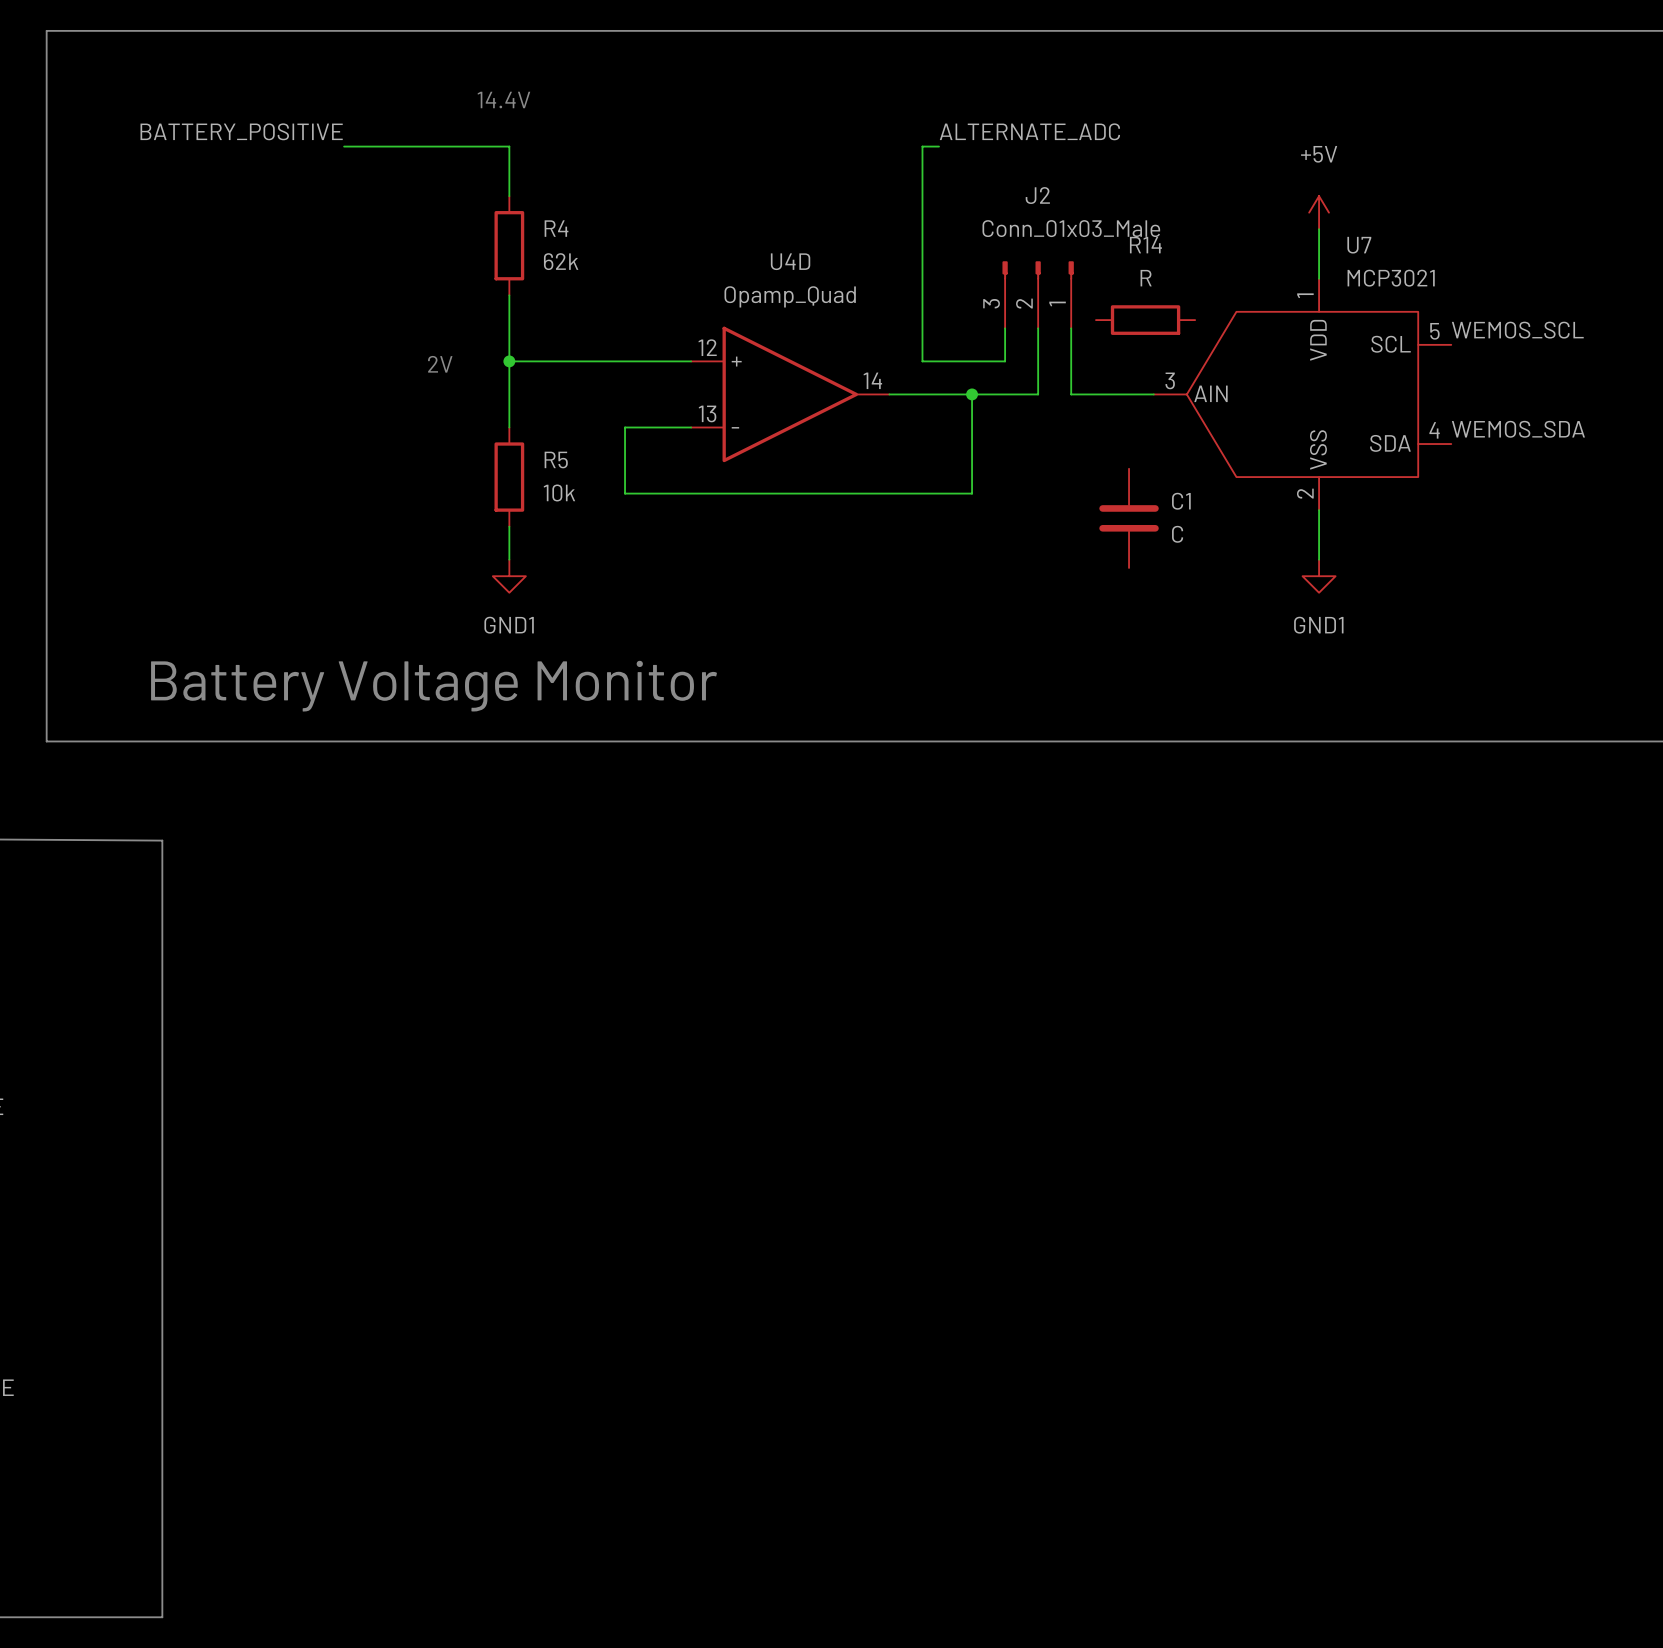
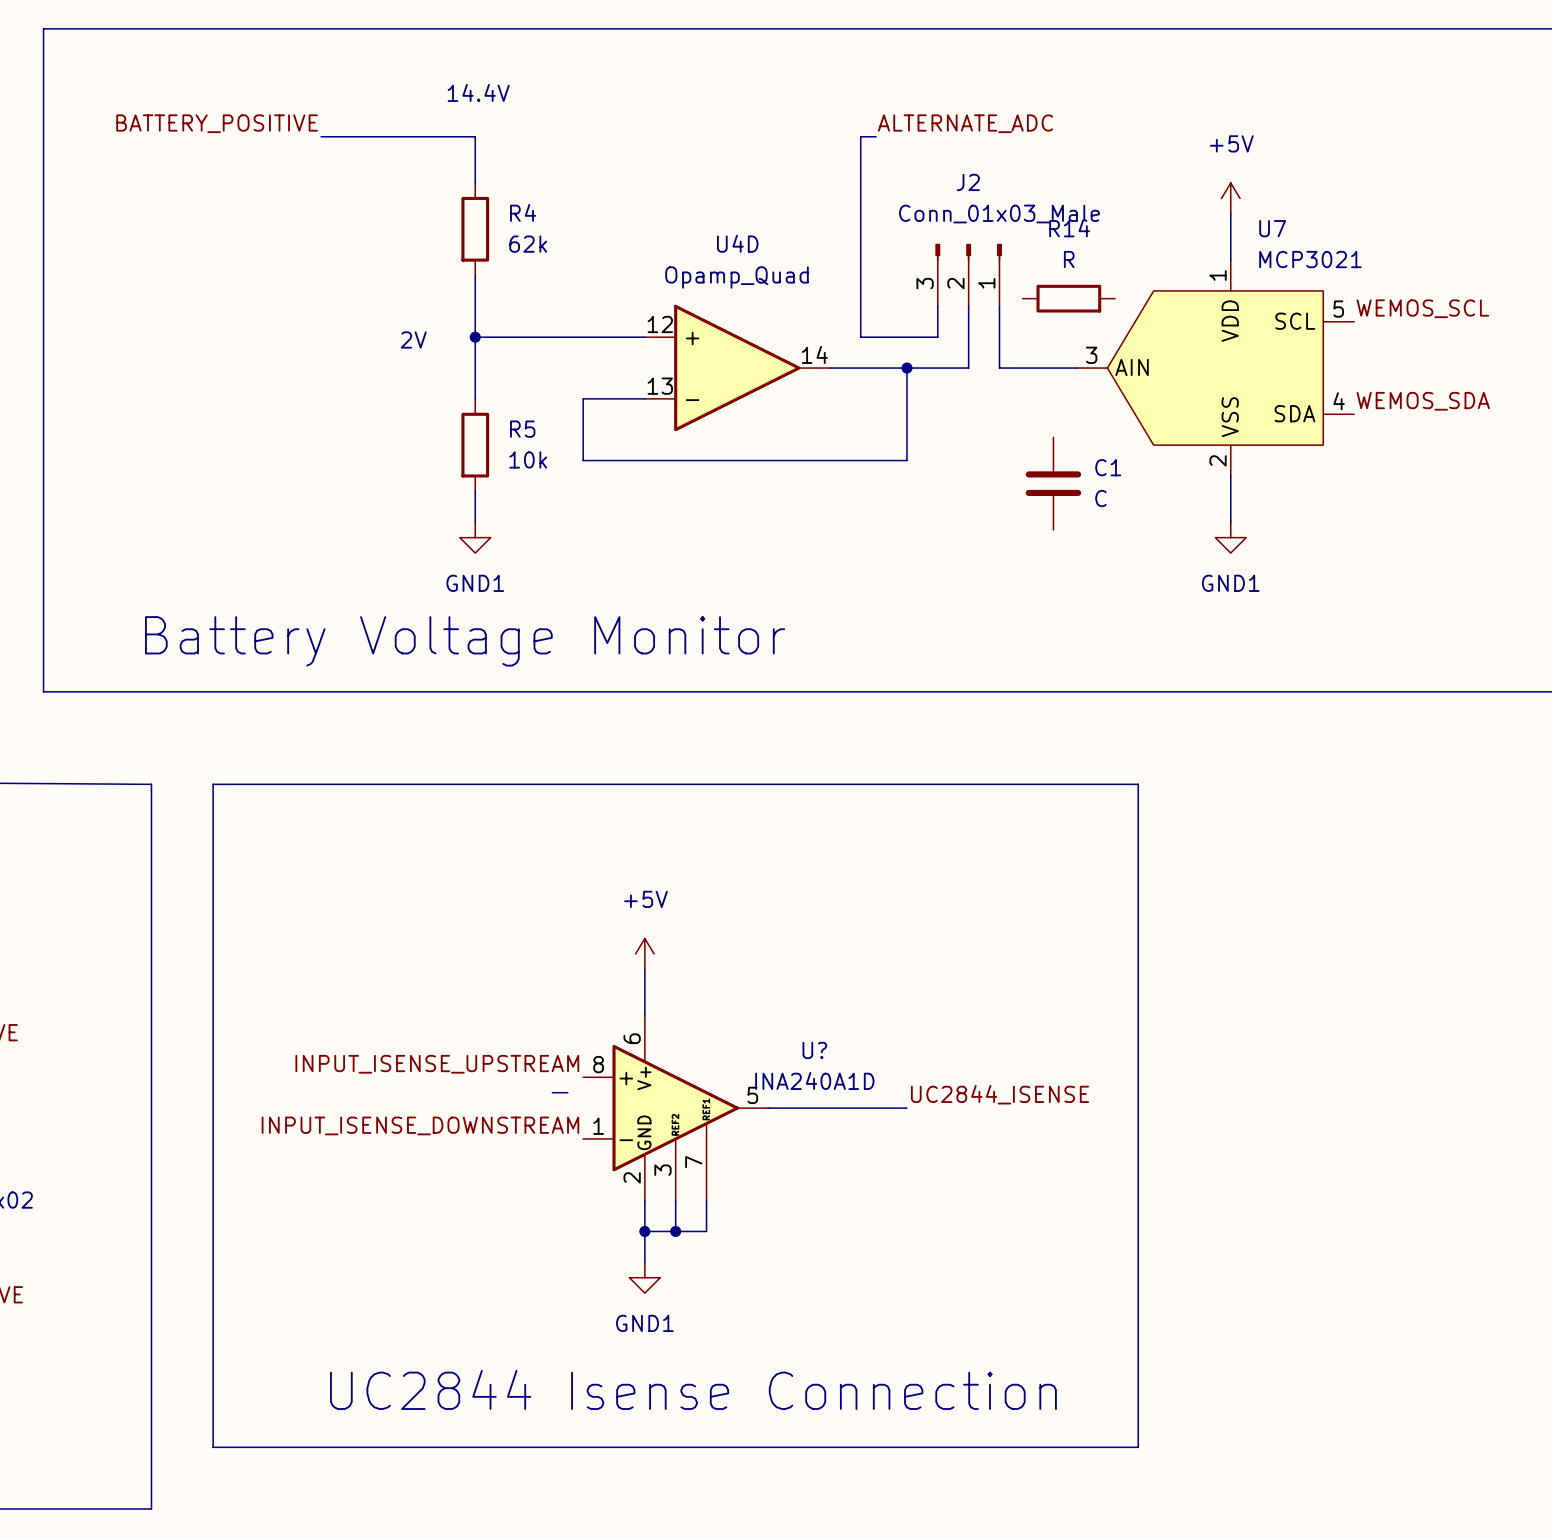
line: none -> (213, 784) (213, 1447) (1138, 1447) (1138, 784) (213, 784)
power symbol: none -> +5V (644, 953)
wire: none -> (644, 969) (644, 1015)
label: none -> INPUT_ISENSE_UPSTREAM (437, 1064)
line: none -> (552, 1092) (567, 1092)
label: none -> UC2844_ISENSE (999, 1094)
U?: none -> INA240A1D (675, 1108)
wire: none -> (768, 1108) (906, 1108)
label: none -> INPUT_ISENSE_DOWNSTREAM (420, 1125)
wire: none -> (644, 1200) (644, 1262)
wire: none -> (675, 1200) (675, 1231)
wire: none -> (706, 1200) (706, 1231) (644, 1231)
junction: none -> (644, 1231)
junction: none -> (675, 1231)
power symbol: none -> GND1 (644, 1277)
text: none -> UC2844 Isense Connection (693, 1389)

